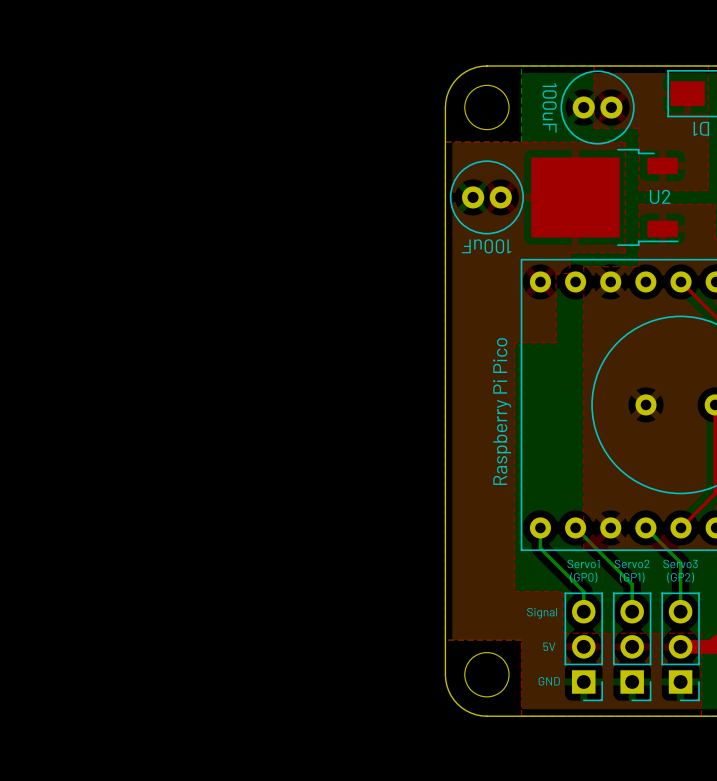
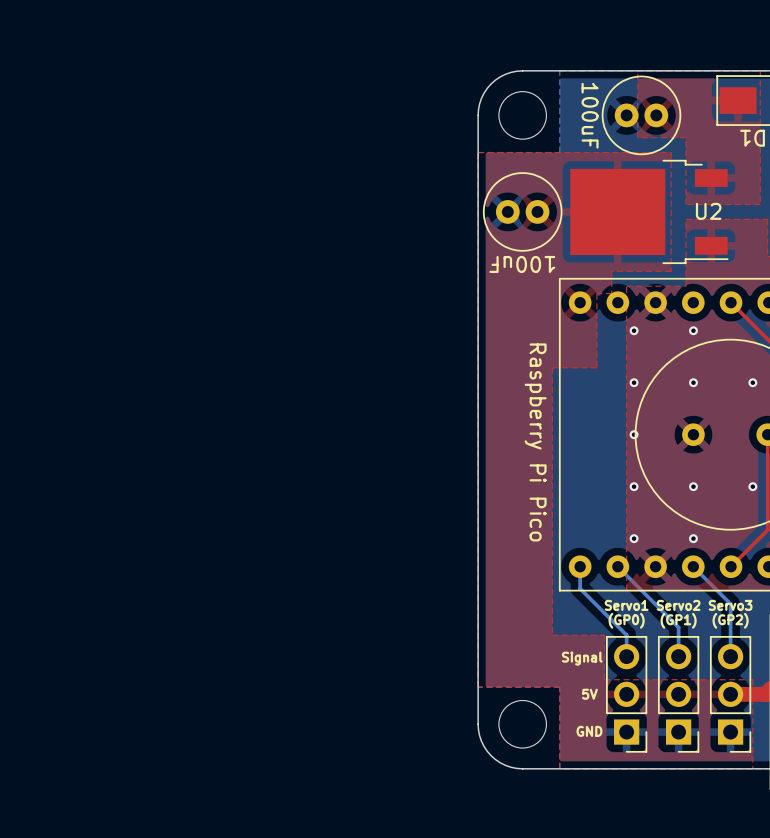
via: none -> (634, 330)
via: none -> (693, 330)
via: none -> (634, 382)
via: none -> (693, 382)
via: none -> (752, 382)
via: none -> (634, 434)
text rotation: 0° (502, 411) -> 180° (535, 442)
via: none -> (634, 486)
via: none -> (693, 486)
via: none -> (752, 486)
via: none -> (634, 538)
via: none -> (693, 538)

